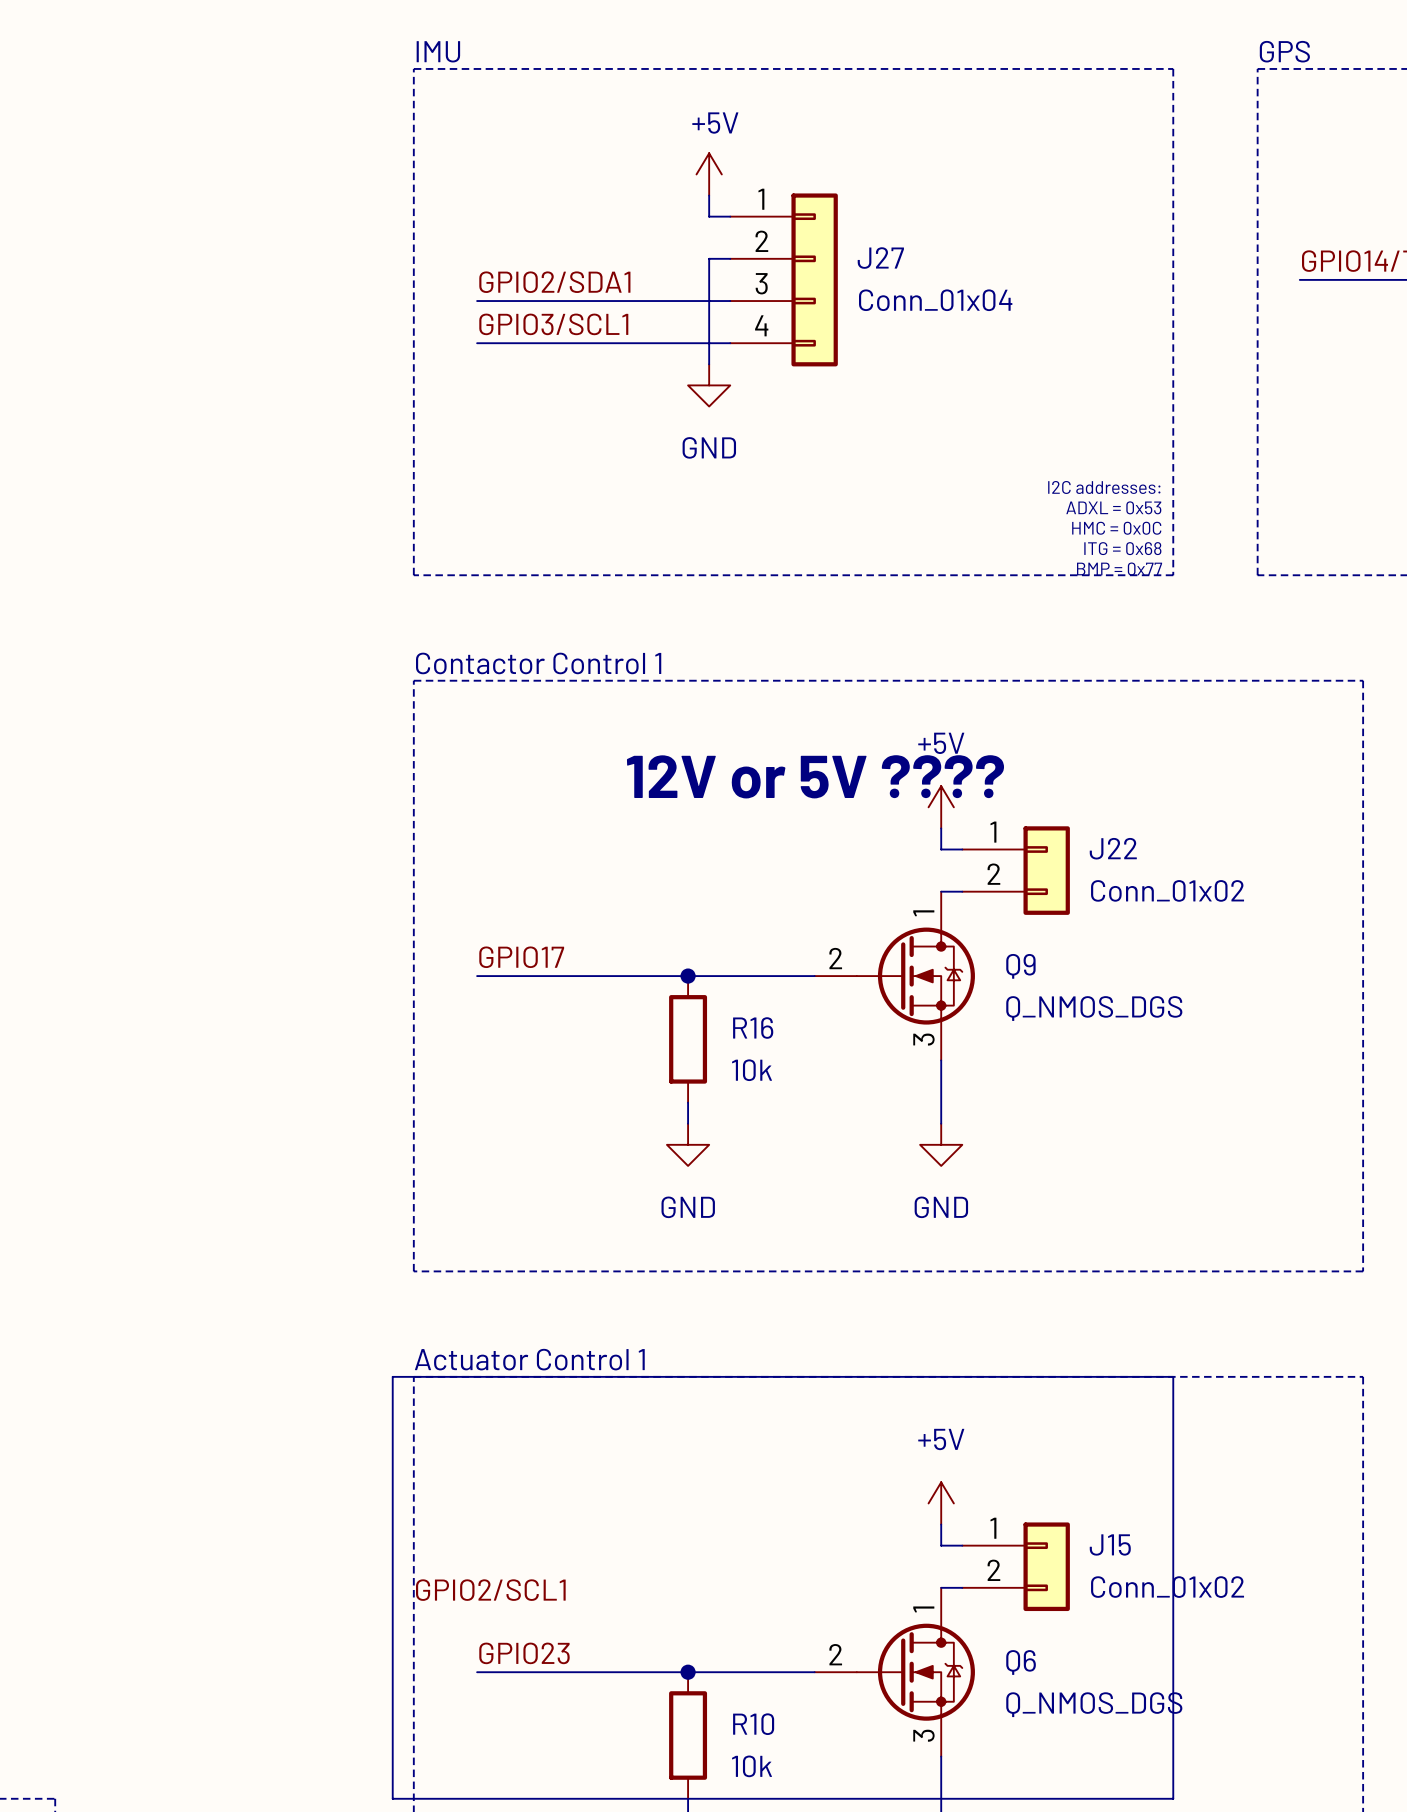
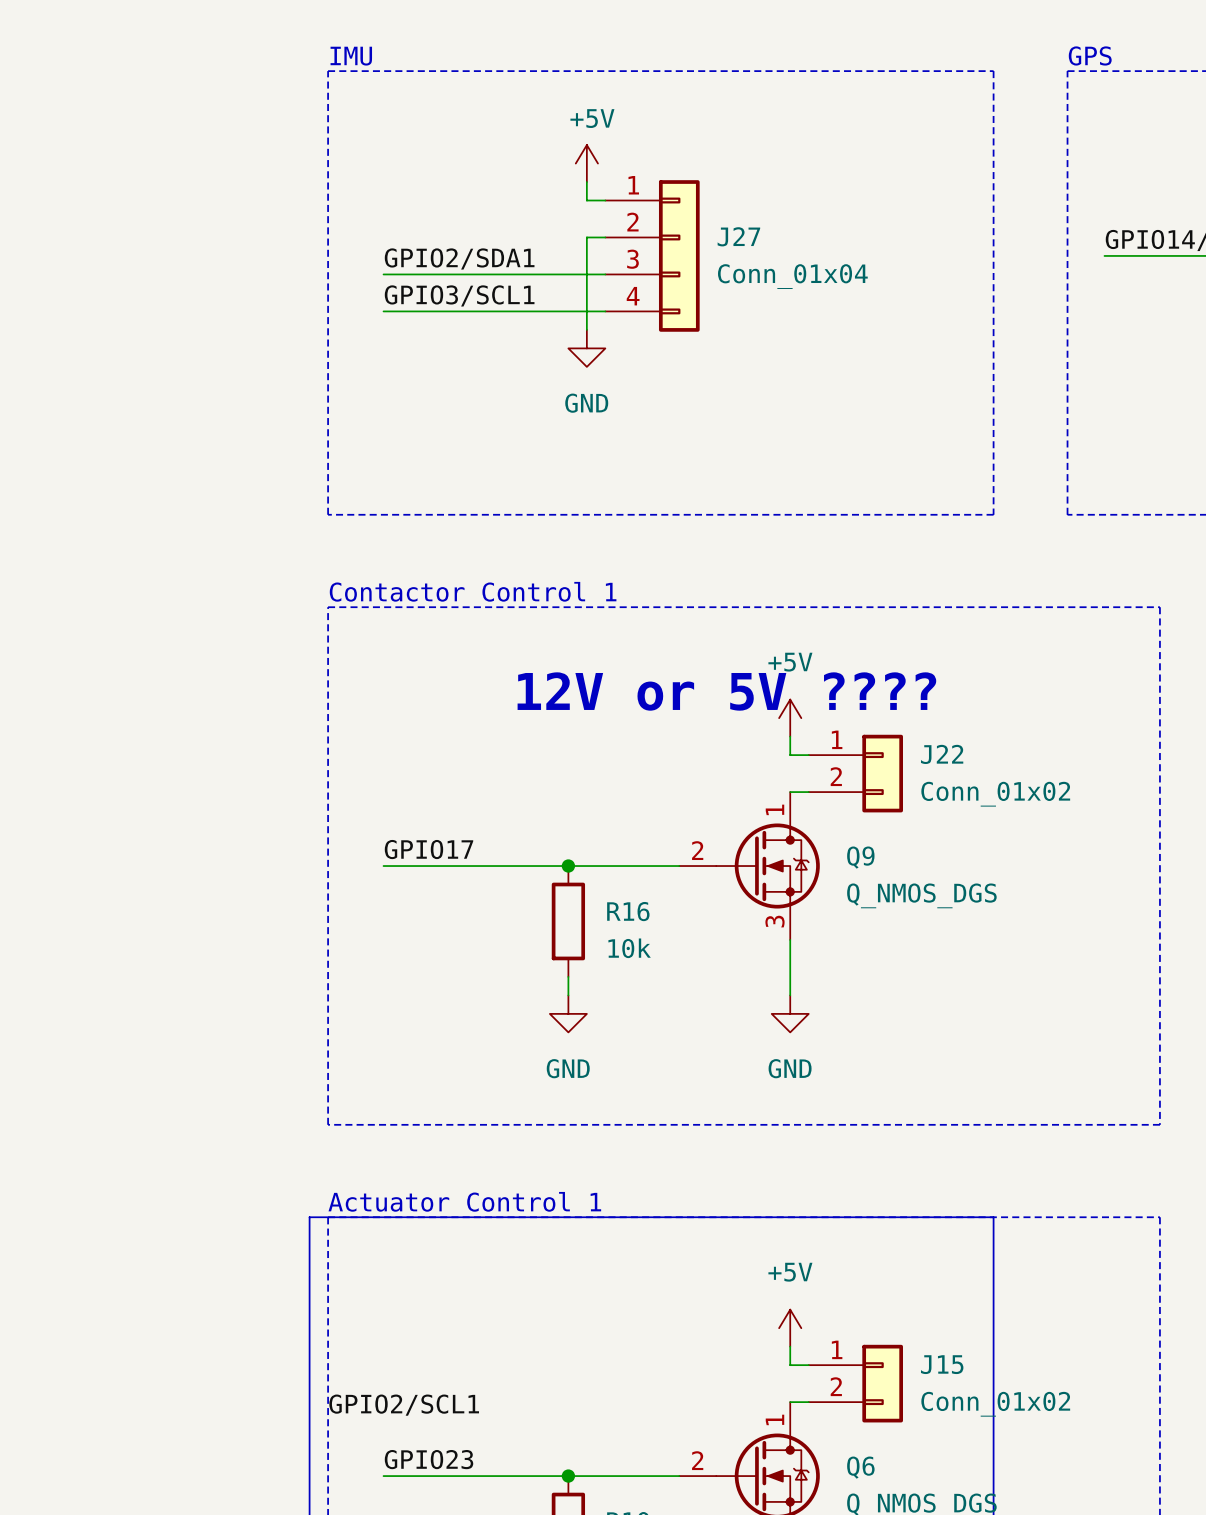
text: I2C addresses: (1104, 487) -> none
text: ADXL = 0x53 (1113, 507) -> none
text: HMC = 0x0C (1116, 528) -> none
text: ITG = 0x68 (1122, 548) -> none
text: BMP = 0x77 (1119, 568) -> none

